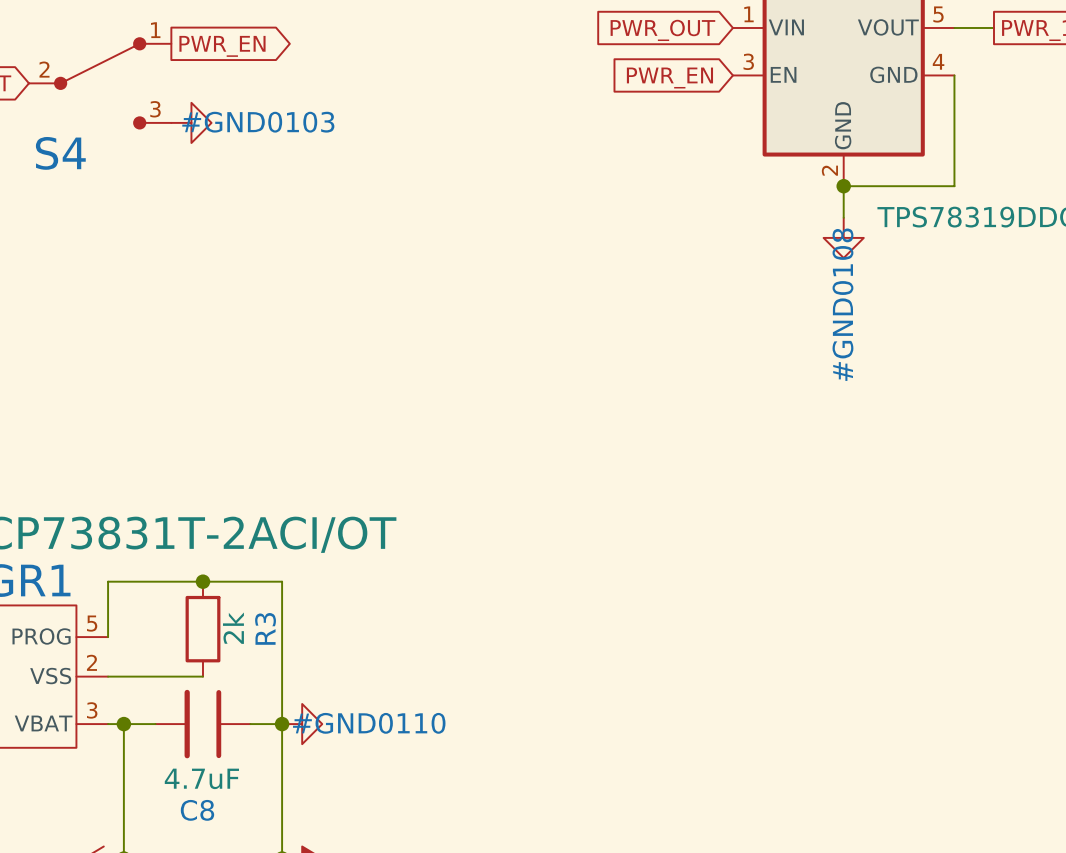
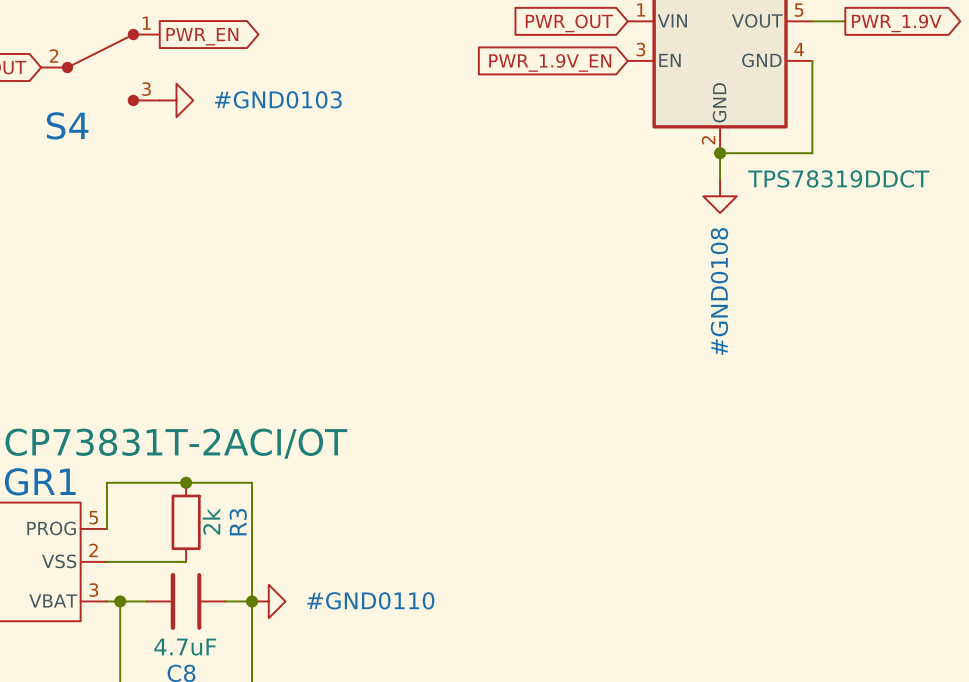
global label: PWR_EN (669, 78) -> PWR_1.9V_EN (550, 62)
#GND0103 name position: #GND0103 (258, 122) -> #GND0103 (278, 99)
#GND0108 name position: #GND0108 (842, 304) -> #GND0108 (719, 291)
#GND0110 name position: #GND0110 (369, 723) -> #GND0110 (370, 600)

